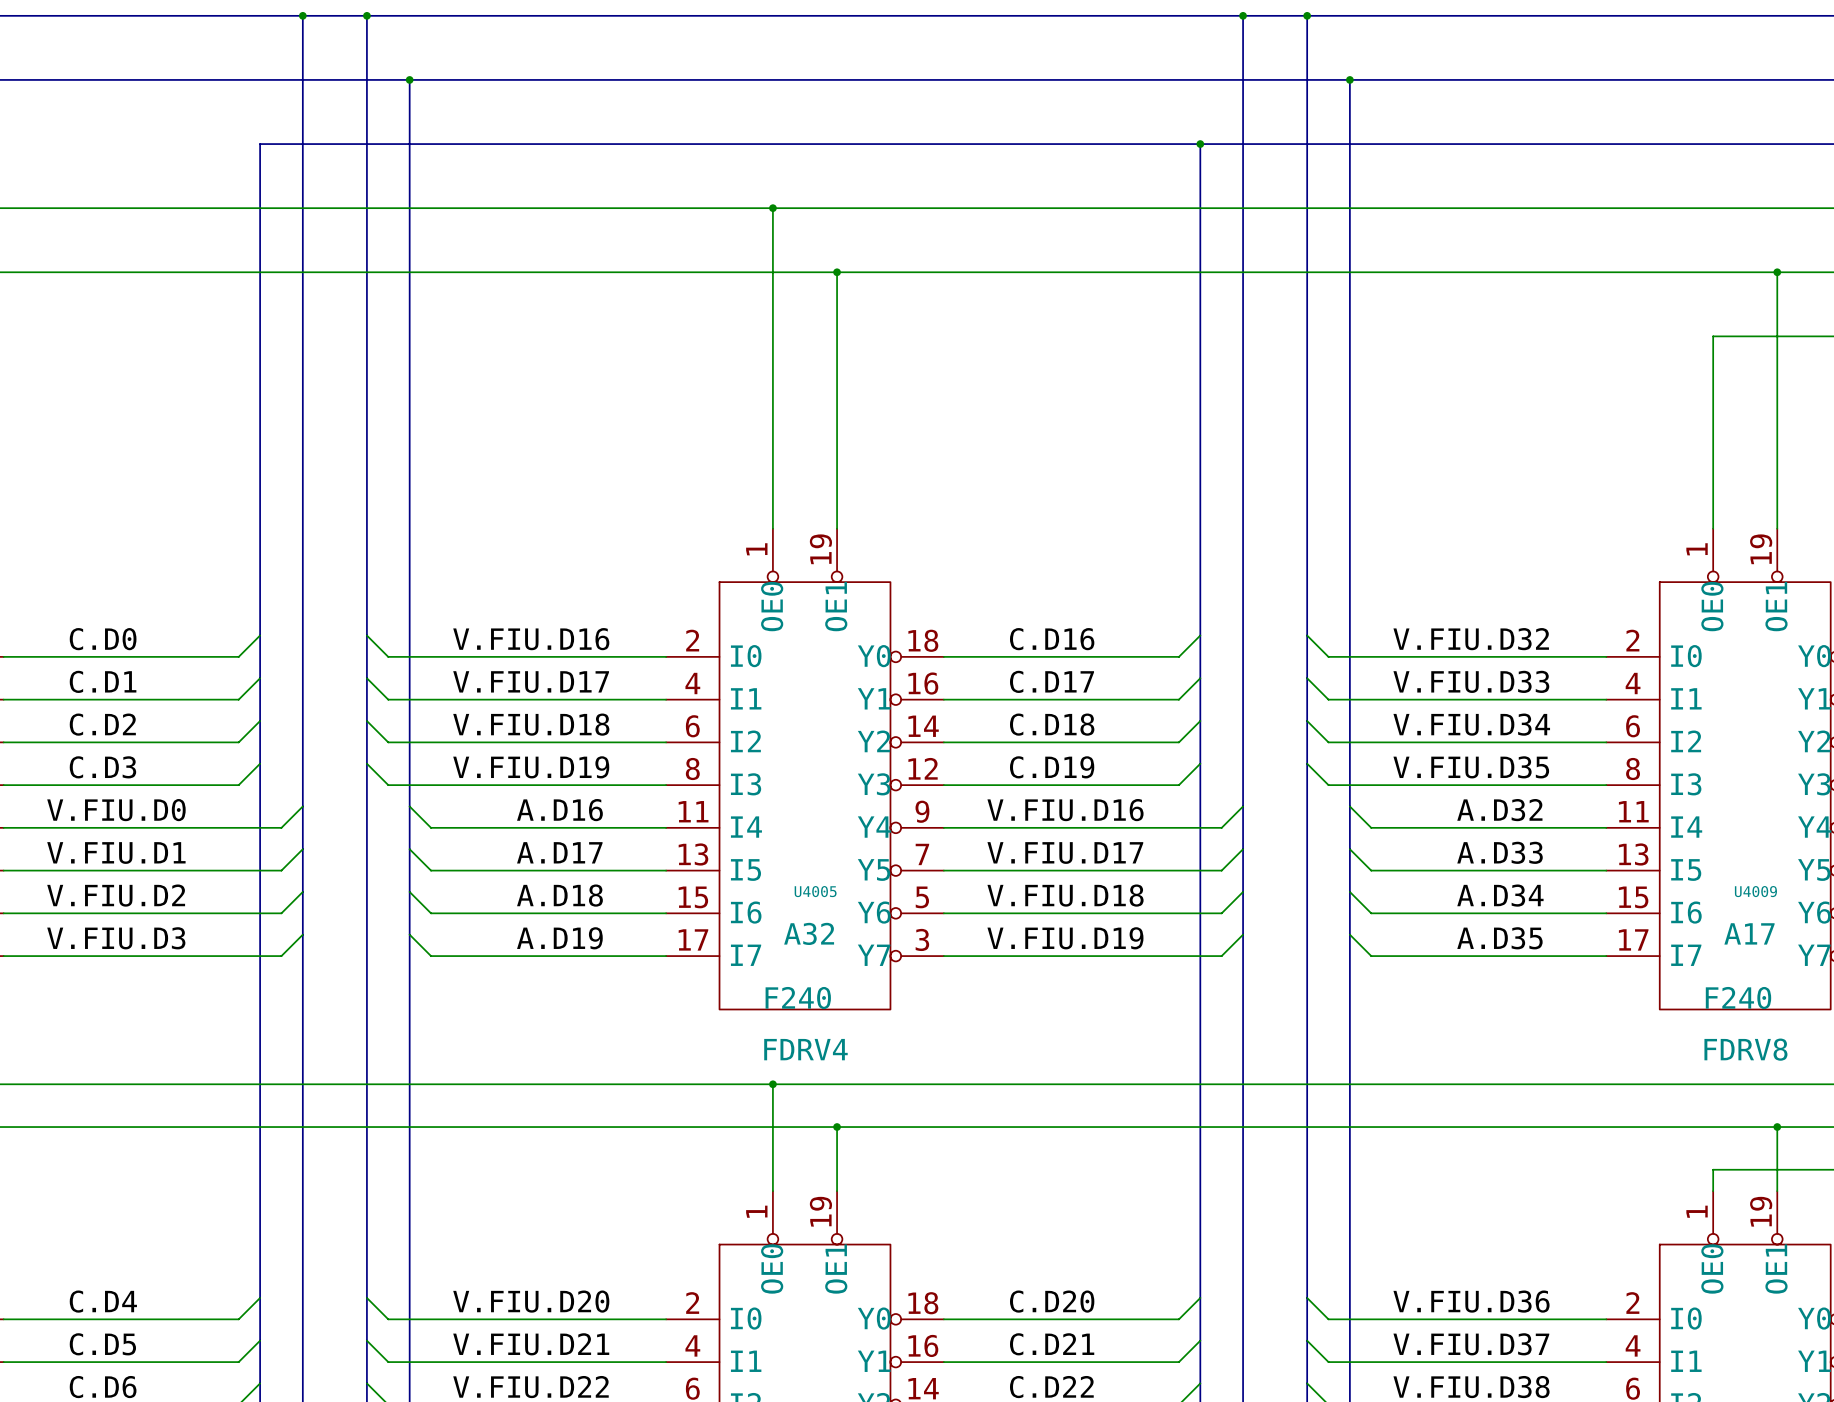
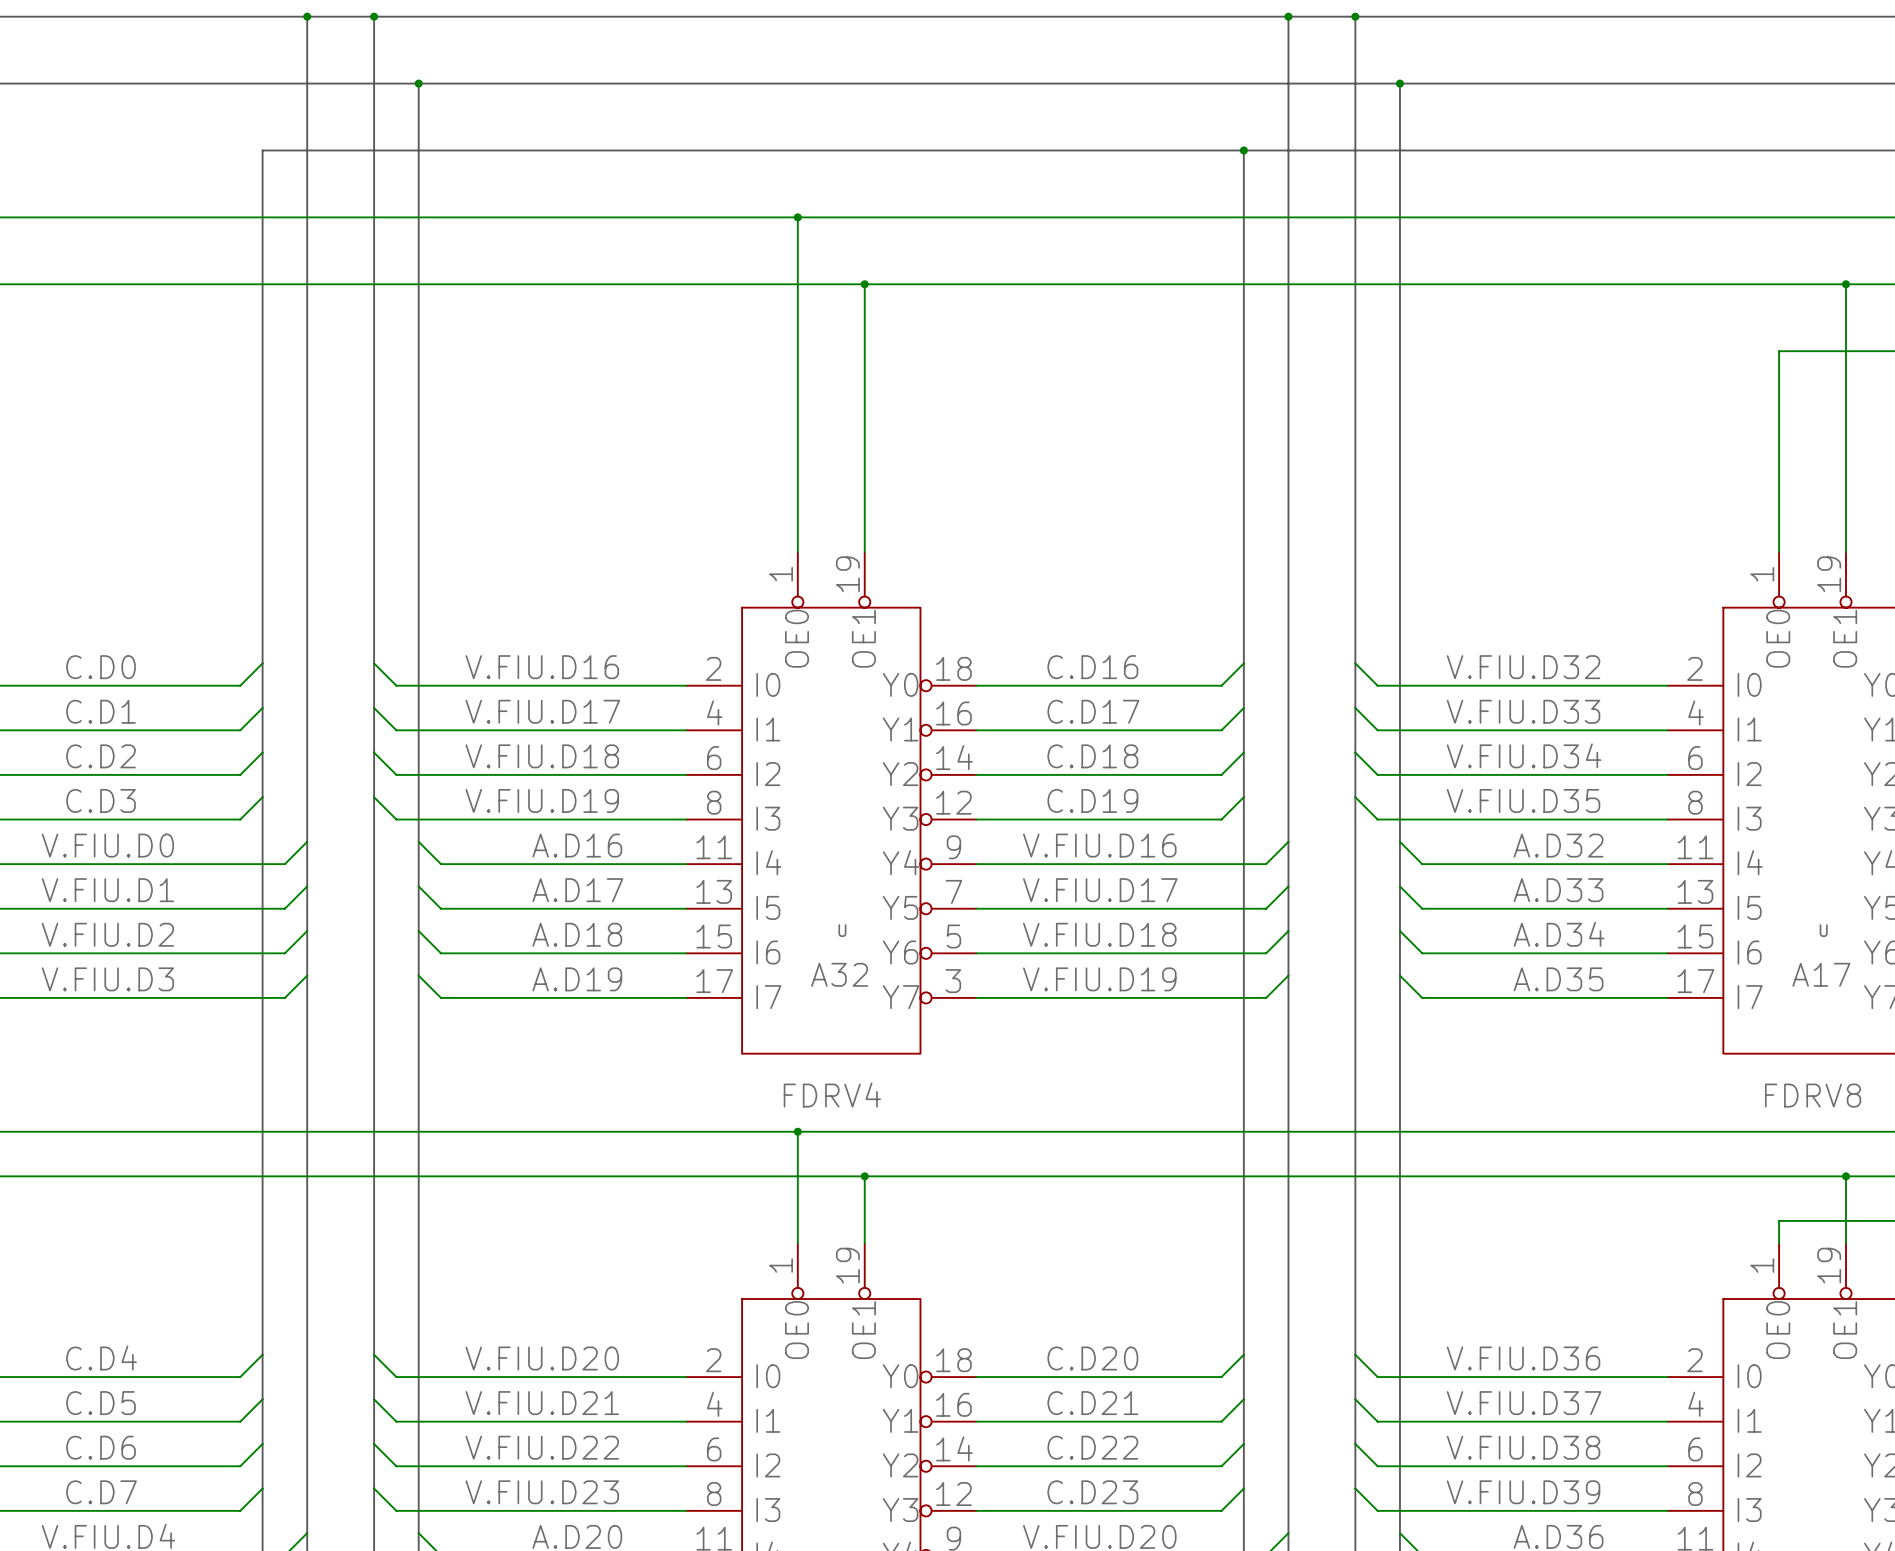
U4005 name: U4005 (815, 891) -> U (842, 930)
U4009 name: U4009 (1755, 891) -> U (1823, 930)
U4005 value: F240 (798, 998) -> none
U4009 value: F240 (1738, 998) -> none

